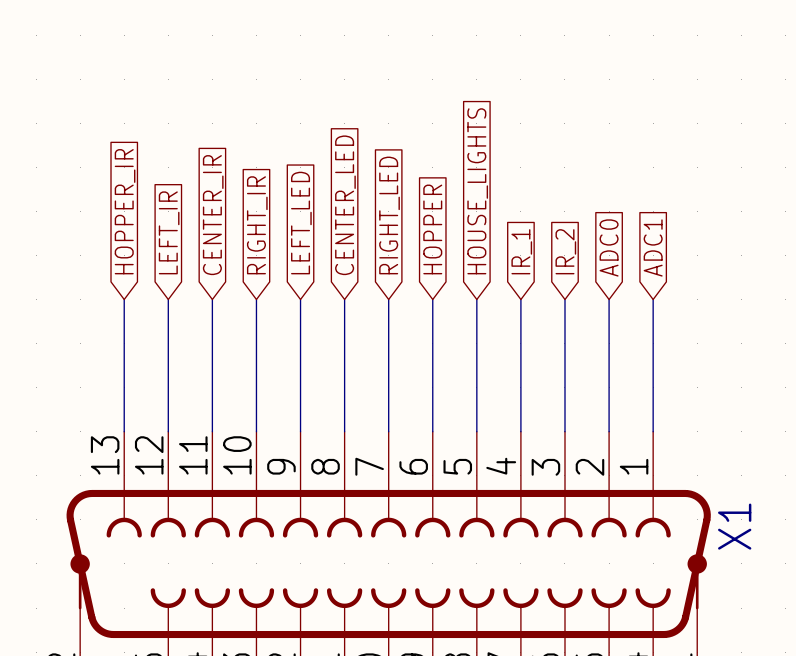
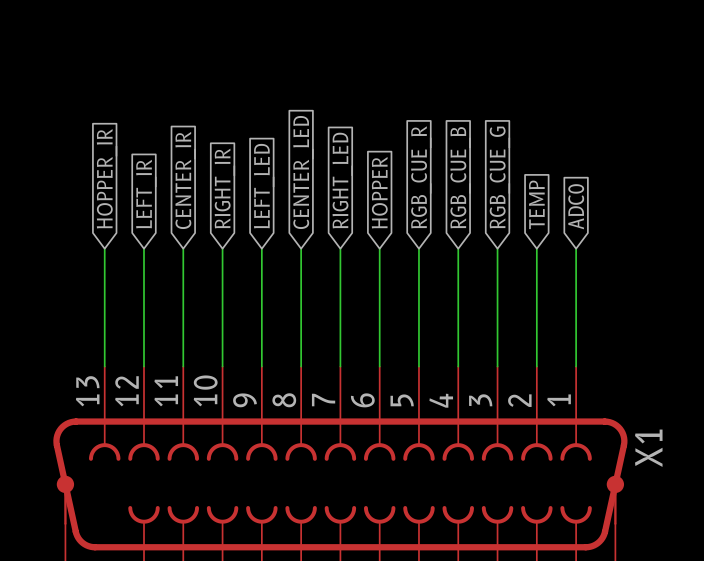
global label: HOUSE_LIGHTS (477, 191) -> RGB_CUE_R (421, 177)
global label: ADC0 (609, 247) -> TEMP (536, 204)
global label: ADC1 (653, 247) -> ADC0 (576, 206)
global label: IR_1 (521, 251) -> RGB_CUE_B (460, 177)
global label: IR_2 (565, 251) -> RGB_CUE_G (499, 177)

